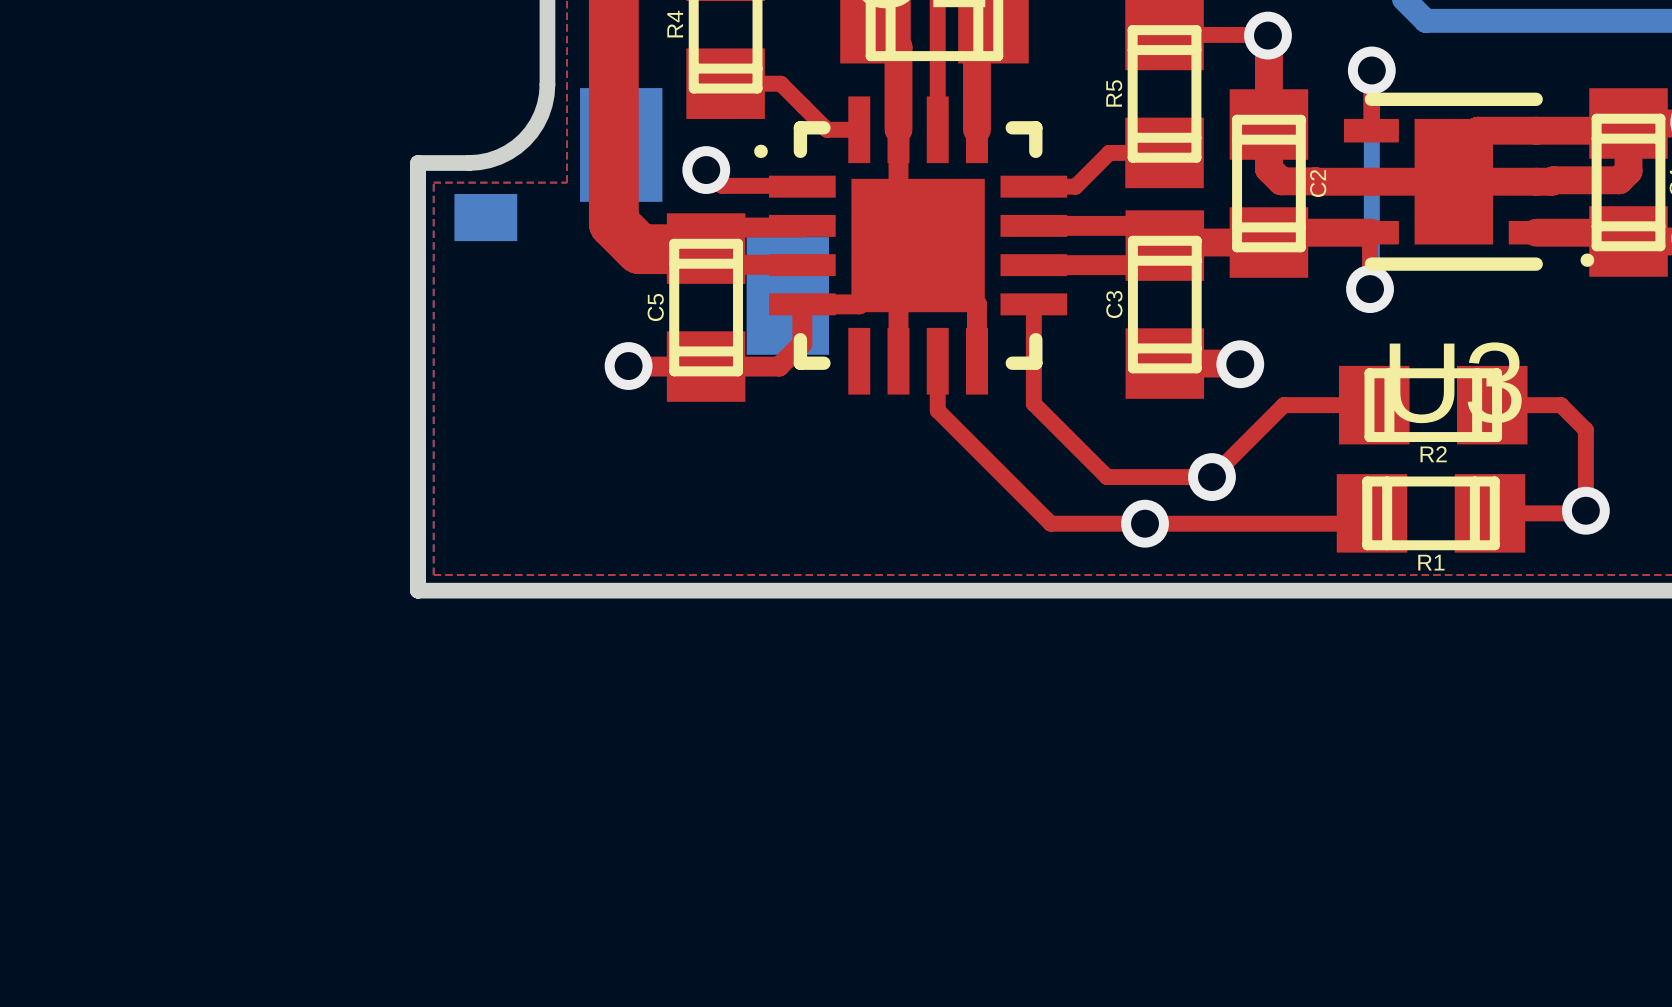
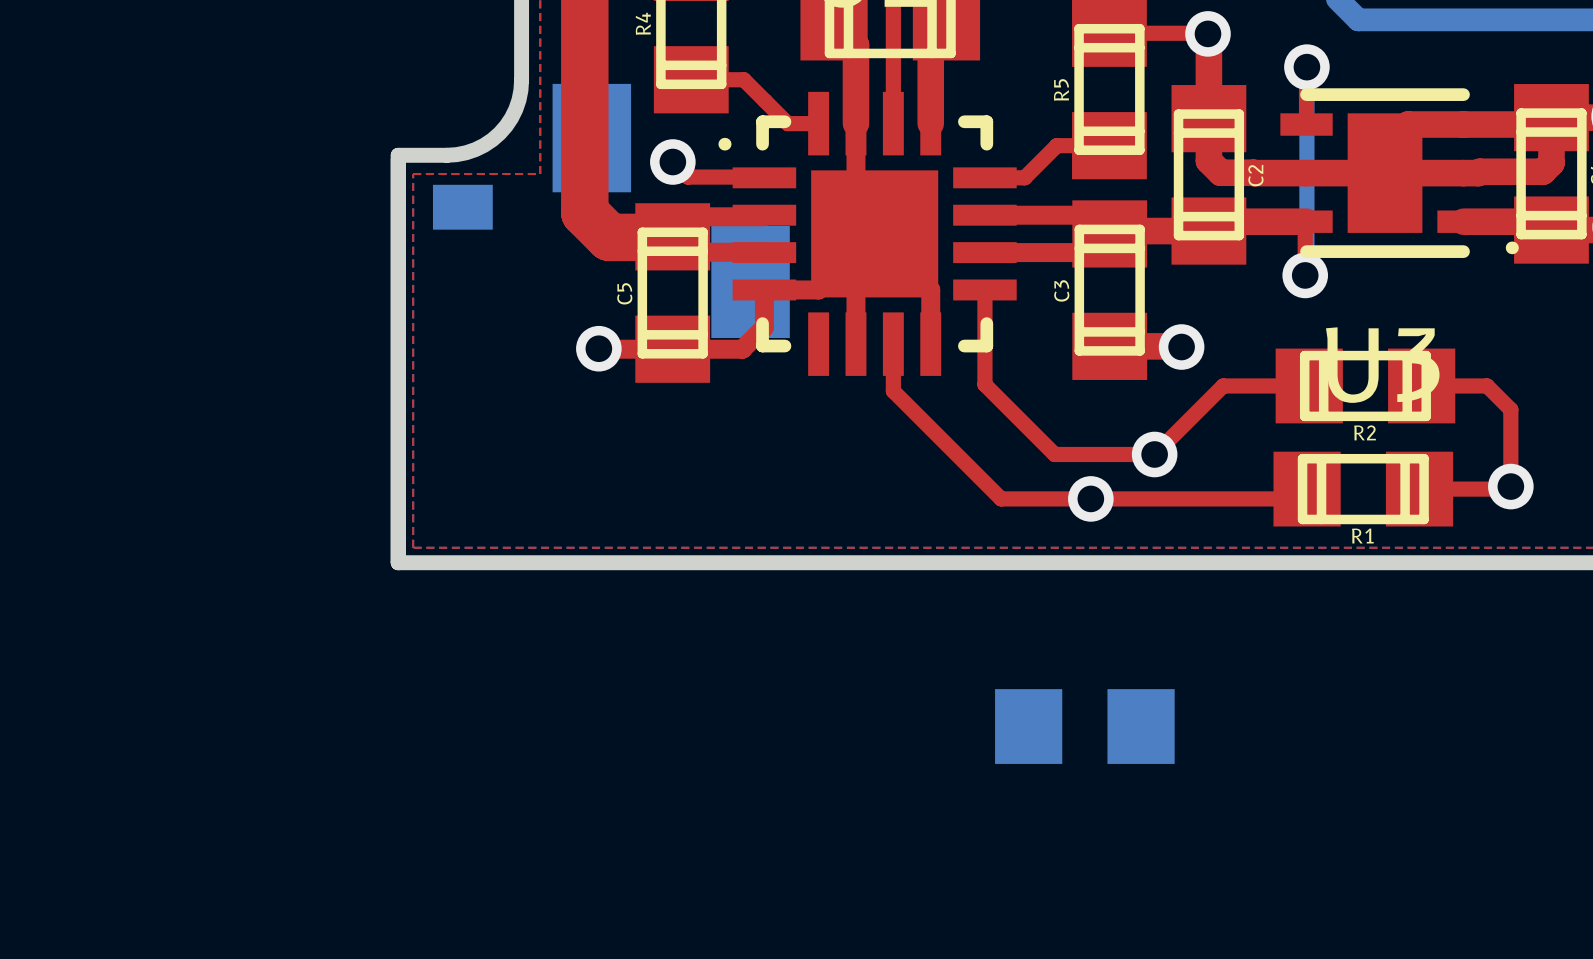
part: none -> (1084, 726)

